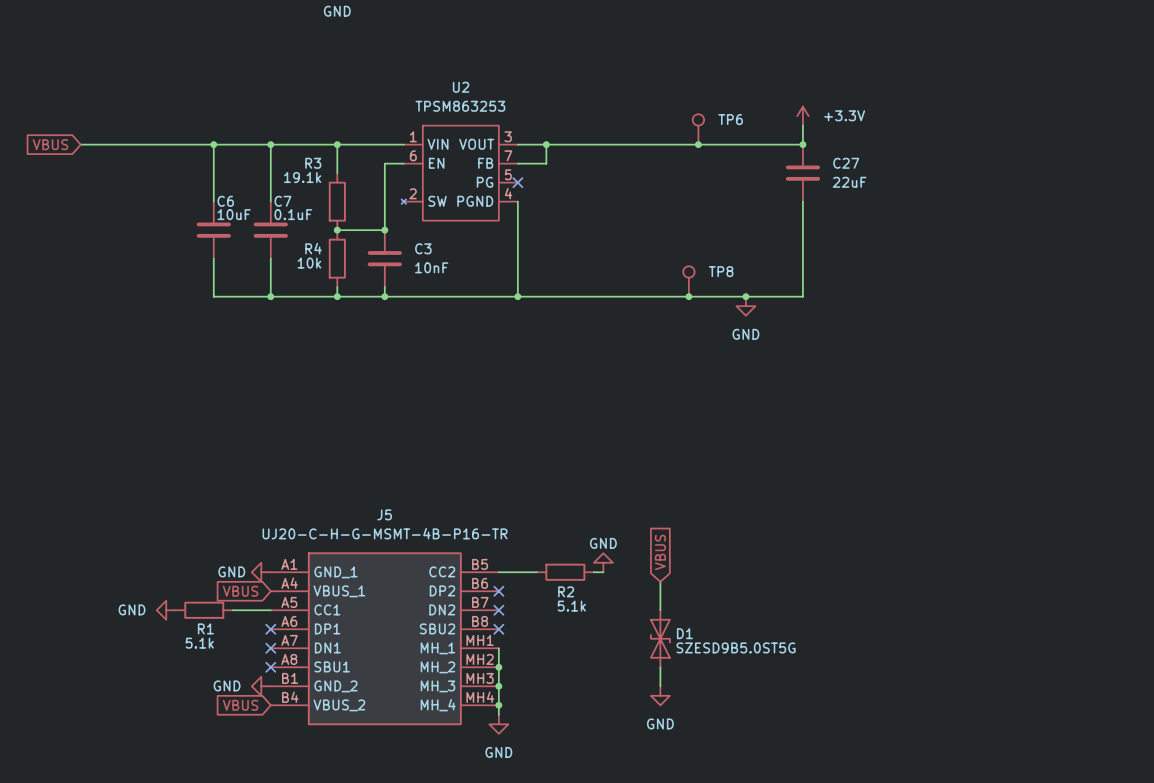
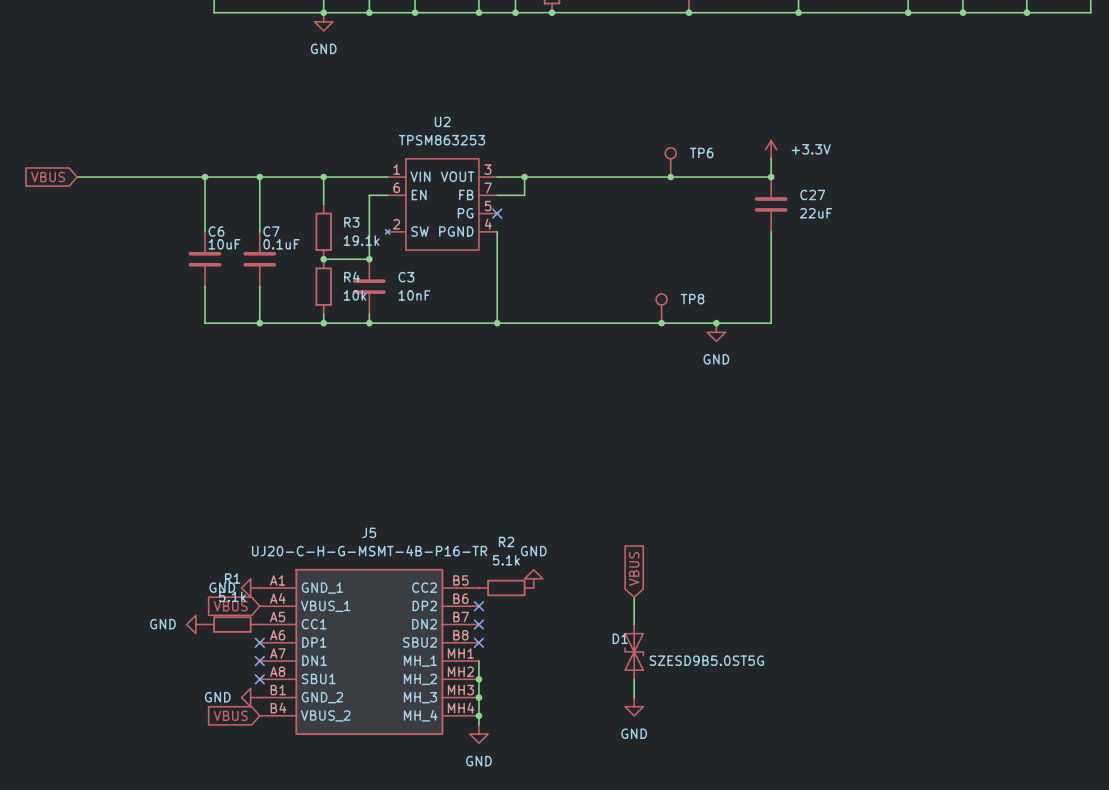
R3 name position: R3 (313, 163) -> R3 (351, 222)
R3 value position: 19.1k (302, 177) -> 19.1k (361, 240)
R4 name position: R4 (313, 248) -> R4 (352, 276)
R4 value position: 10k (309, 263) -> 10k (355, 295)
power symbol text position: GND (603, 543) -> GND (533, 551)
power symbol position: GND (603, 562) -> GND (533, 578)
wire: (498, 572) (536, 572) -> none
R2 position: (565, 572) -> (506, 587)
wire: (593, 572) (603, 572) -> none
R2 name position: R2 (566, 591) -> R2 (506, 541)
R2 value position: 5.1k (571, 606) -> 5.1k (506, 560)
power symbol position: GND (166, 610) -> GND (195, 624)
R1 position: (204, 610) -> (232, 624)
wire: (232, 610) (270, 610) -> none
R1 name position: R1 (205, 628) -> R1 (232, 578)
D1 name position: D1 (684, 633) -> D1 (620, 638)
R1 value position: 5.1k (199, 643) -> 5.1k (232, 596)

